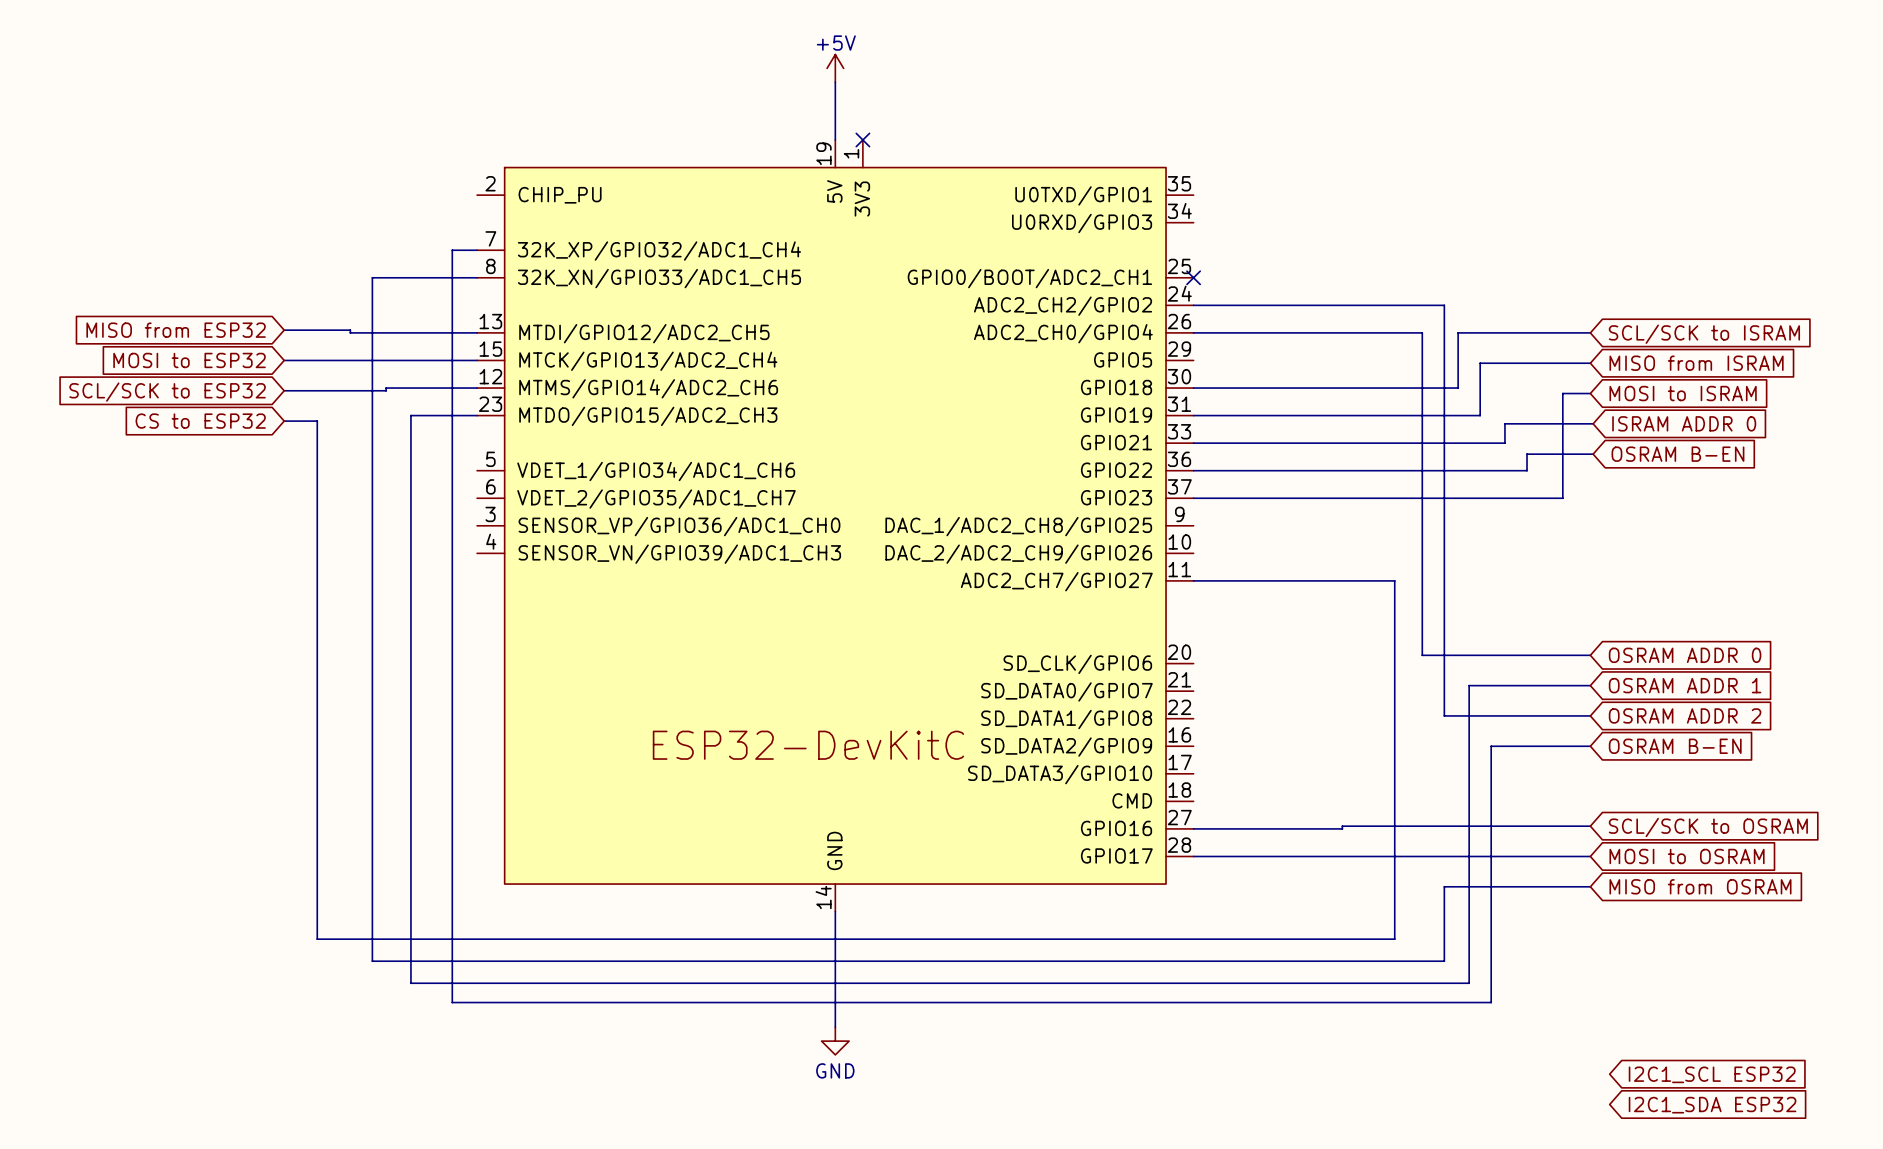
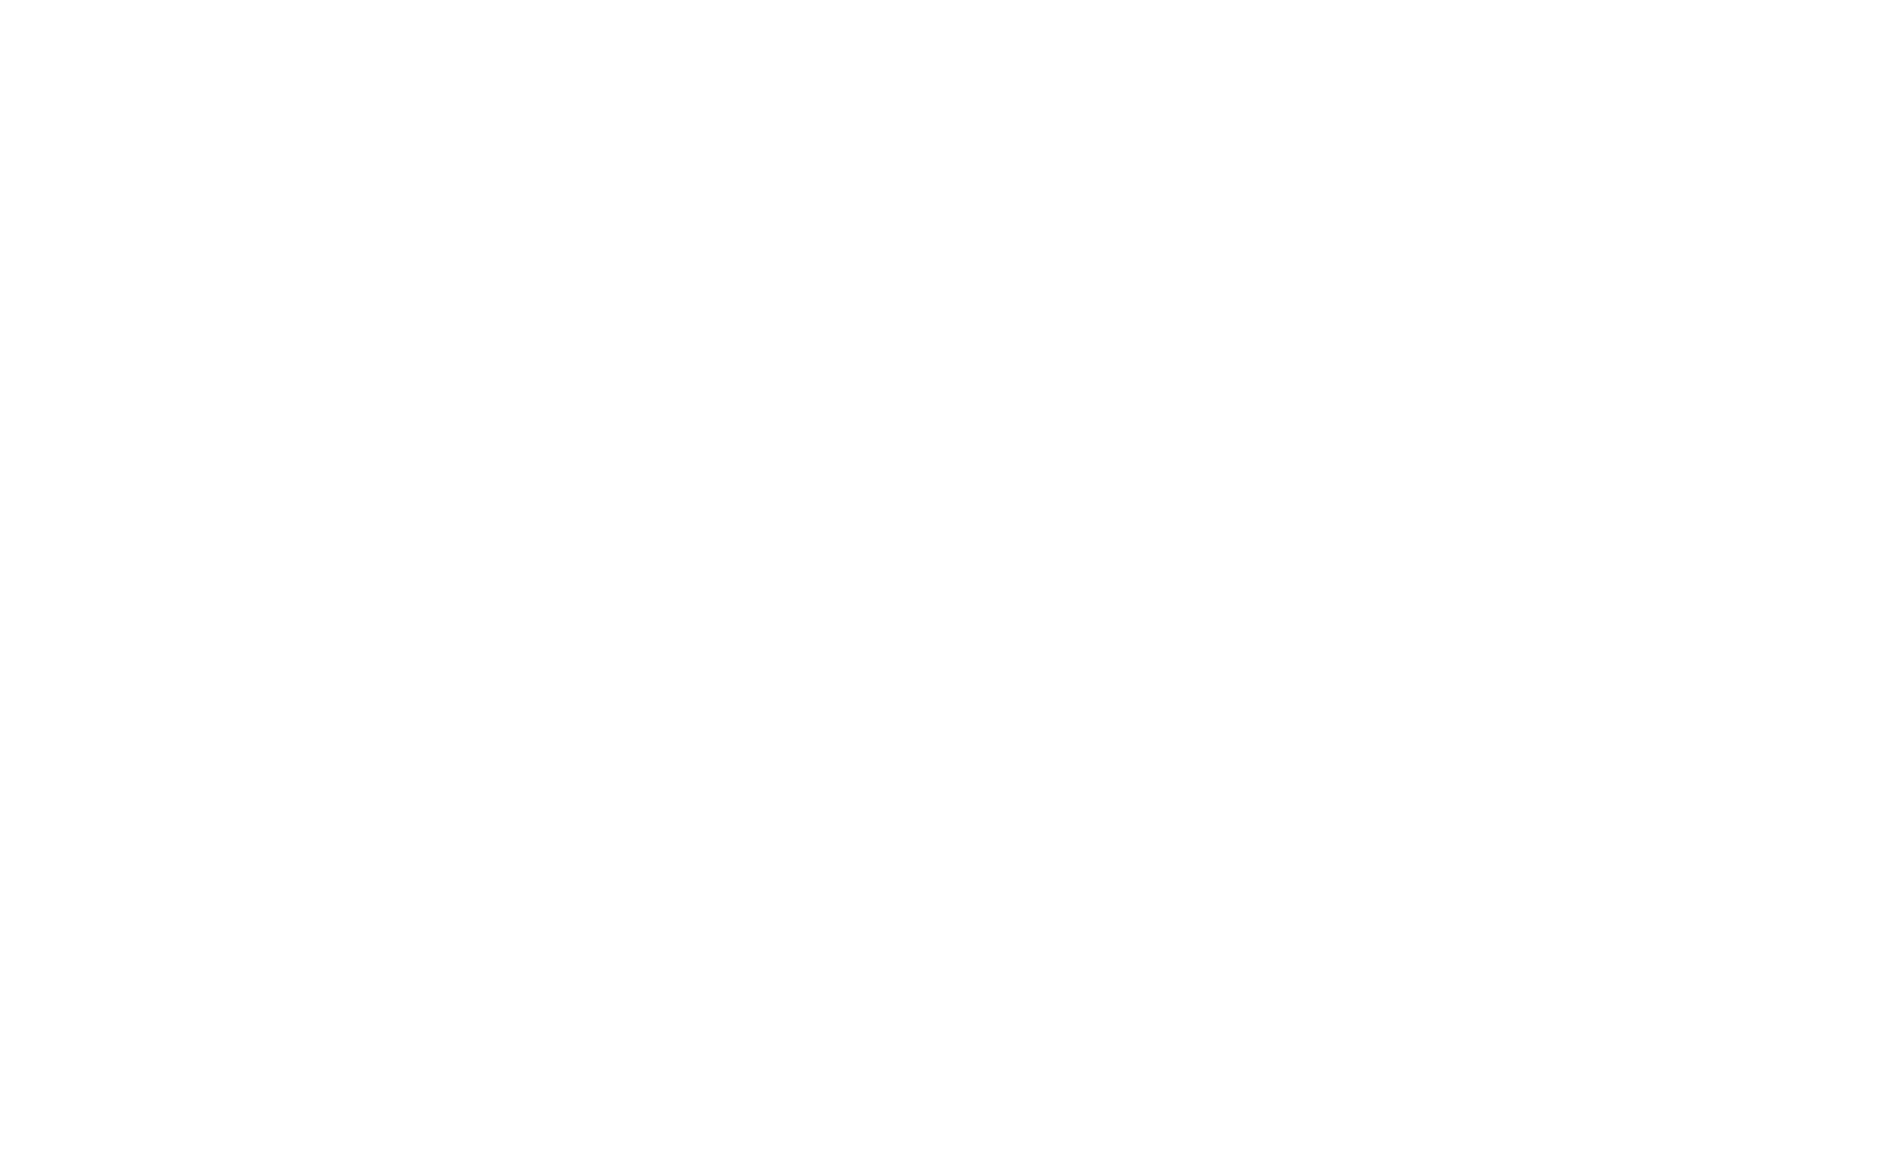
power symbol: +5V (835, 68) -> none
wire: (835, 82) (835, 140) -> none
no-connect mark: (862, 140) -> none
wire: (477, 250) (452, 250) (452, 1002) (1491, 1002) (1491, 746) (1590, 746) -> none
wire: (477, 277) (372, 277) (372, 961) (1444, 961) (1444, 886) (1590, 886) -> none
no-connect mark: (1193, 277) -> none
wire: (1193, 305) (1444, 305) (1444, 715) (1590, 715) -> none
global label: MISO from ESP32 (176, 330) -> none
wire: (284, 330) (350, 330) (350, 332) (477, 332) -> none
wire: (1193, 332) (1422, 332) (1422, 655) (1590, 655) -> none
wire: (1590, 332) (1458, 332) (1458, 388) (1193, 388) -> none
global label: SCL/SCK to ISRAM (1704, 334) -> none
global label: MOSI to ESP32 (189, 360) -> none
wire: (284, 360) (477, 360) -> none
wire: (1590, 363) (1480, 363) (1480, 415) (1193, 415) -> none
global label: MISO from ISRAM (1696, 363) -> none
wire: (477, 388) (284, 390) -> none
global label: SCL/SCK to ESP32 (167, 392) -> none
wire: (1590, 393) (1562, 393) (1562, 498) (1193, 498) -> none
global label: MOSI to ISRAM (1683, 393) -> none
wire: (477, 415) (410, 415) (410, 983) (1469, 983) (1469, 685) (1590, 685) -> none
global label: CS to ESP32 (200, 421) -> none
wire: (284, 421) (317, 421) (317, 939) (1394, 939) (1394, 580) (1193, 580) -> none
wire: (1593, 423) (1504, 423) (1504, 443) (1193, 443) -> none
global label: ISRAM ADDR 0 (1684, 423) -> none
wire: (1593, 454) (1527, 454) (1527, 470) (1193, 470) -> none
global label: OSRAM B-EN (1677, 454) -> none
part: (835, 525) -> none
global label: OSRAM ADDR 0 (1685, 655) -> none
global label: OSRAM ADDR 1 (1685, 685) -> none
global label: OSRAM ADDR 2 (1685, 715) -> none
global label: OSRAM B-EN (1675, 746) -> none
wire: (1590, 826) (1342, 826) (1342, 828) (1193, 828) -> none
global label: SCL/SCK to OSRAM (1708, 827) -> none
wire: (1193, 856) (1590, 856) -> none
global label: MOSI to OSRAM (1687, 856) -> none
global label: MISO from OSRAM (1700, 886) -> none
wire: (835, 911) (835, 1027) -> none
power symbol: GND (835, 1041) -> none
global label: I2C1_SCL ESP32 (1712, 1074) -> none
global label: I2C1_SDA ESP32 (1712, 1105) -> none

